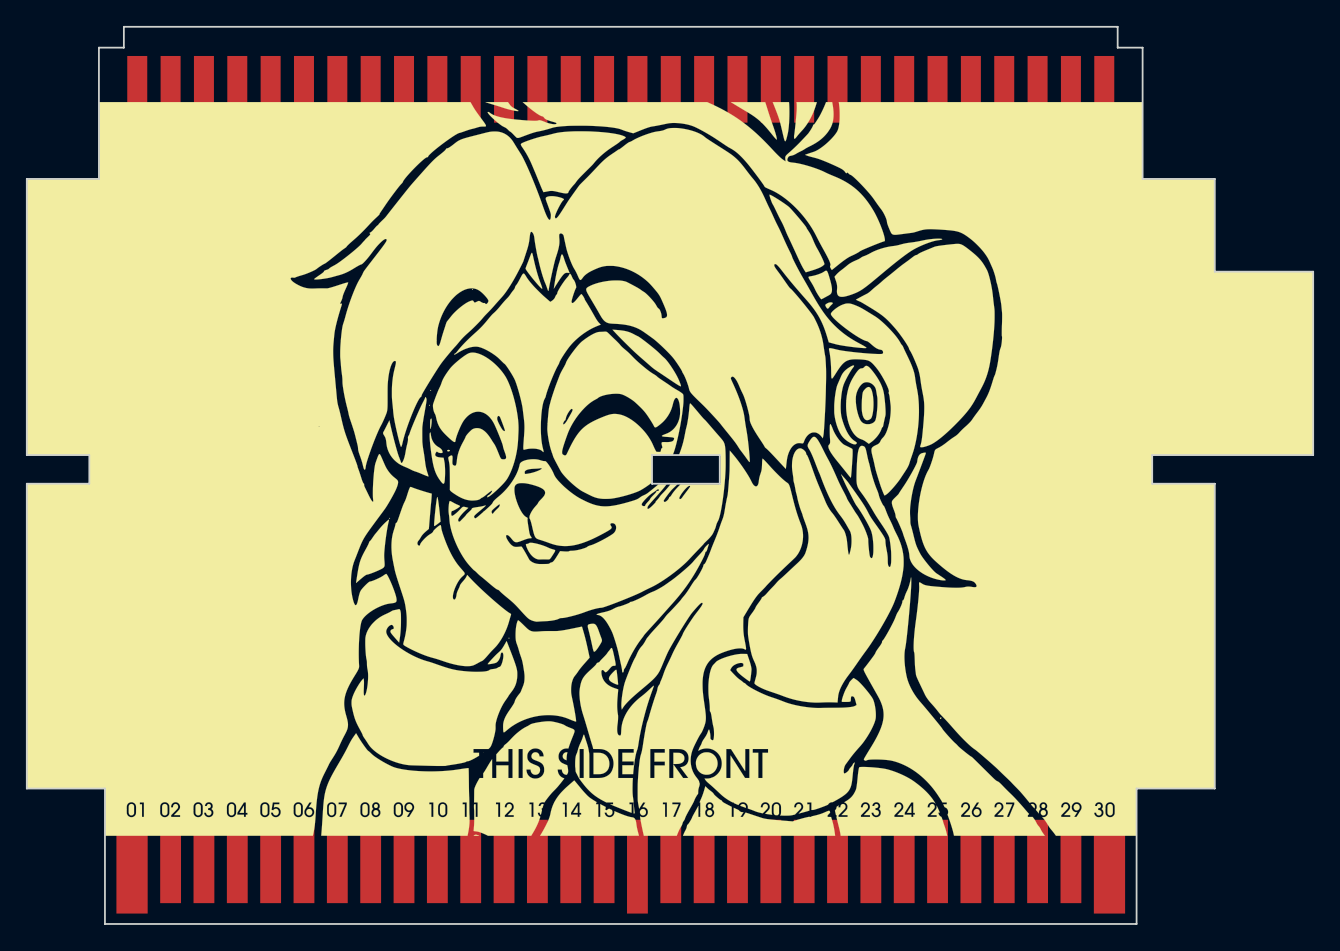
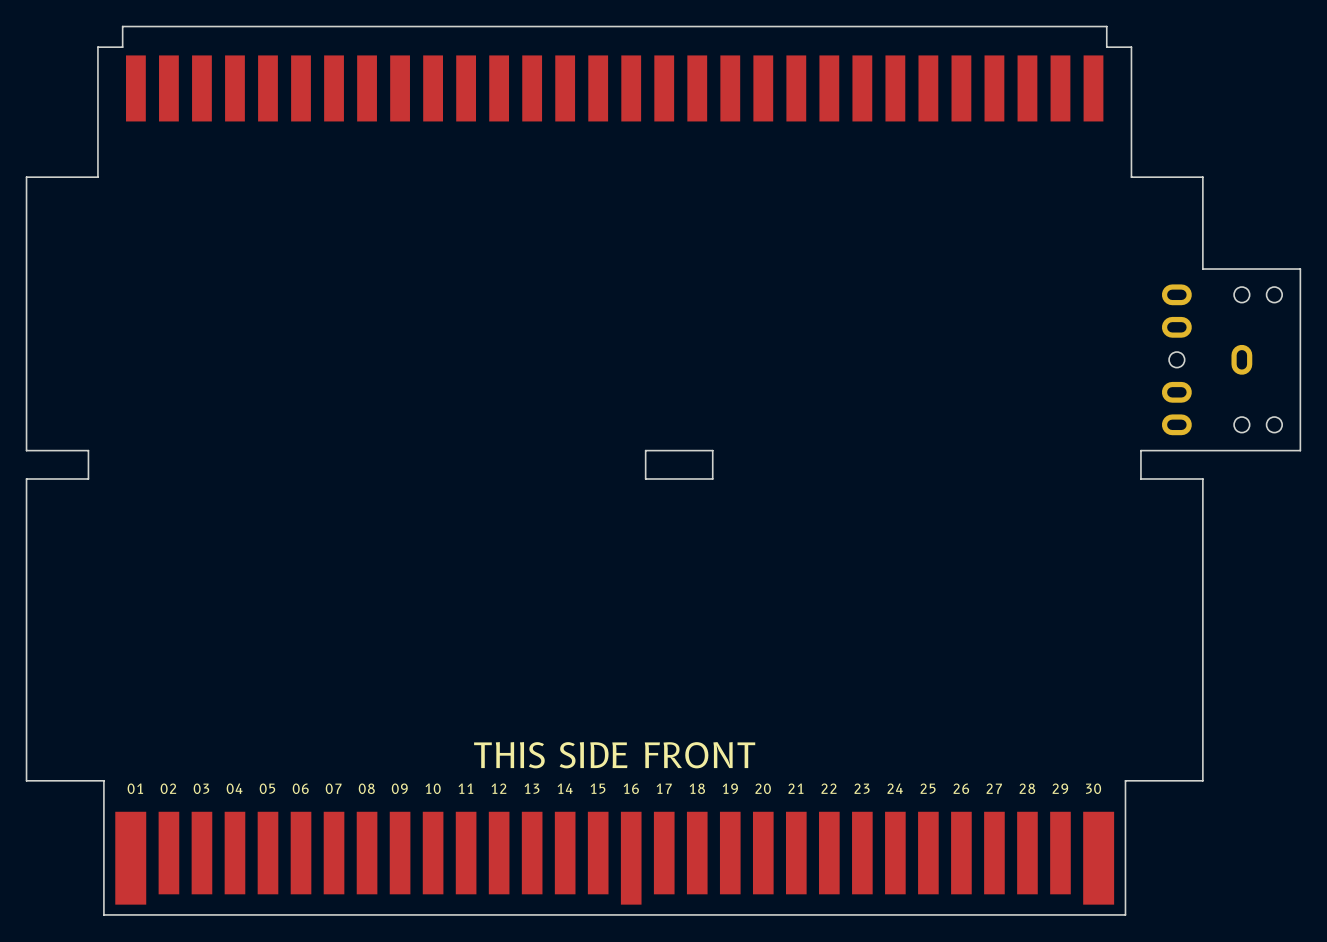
drawing: [26, 102, 1314, 836] -> none
text: none -> THIS SIDE FRONT (614, 755)
text: none -> 01 (135, 788)
text: none -> 02 (168, 788)
text: none -> 03 (201, 788)
text: none -> 04 (234, 788)
text: none -> 05 (267, 788)
text: none -> 06 (300, 788)
text: none -> 07 (333, 788)
text: none -> 08 (366, 788)
text: none -> 09 (399, 788)
text: none -> 10 (433, 788)
text: none -> 11 (465, 788)
text: none -> 12 (498, 788)
text: none -> 13 (532, 788)
text: none -> 14 (565, 788)
text: none -> 15 (598, 788)
text: none -> 16 (631, 788)
text: none -> 17 (664, 788)
text: none -> 18 (697, 788)
text: none -> 19 (730, 788)
text: none -> 20 (763, 788)
text: none -> 21 (795, 788)
text: none -> 22 (829, 788)
text: none -> 23 (862, 788)
text: none -> 24 (895, 788)
text: none -> 25 (928, 788)
text: none -> 26 (961, 788)
text: none -> 27 (994, 788)
text: none -> 28 (1027, 788)
text: none -> 29 (1060, 788)
text: none -> 30 (1093, 788)

